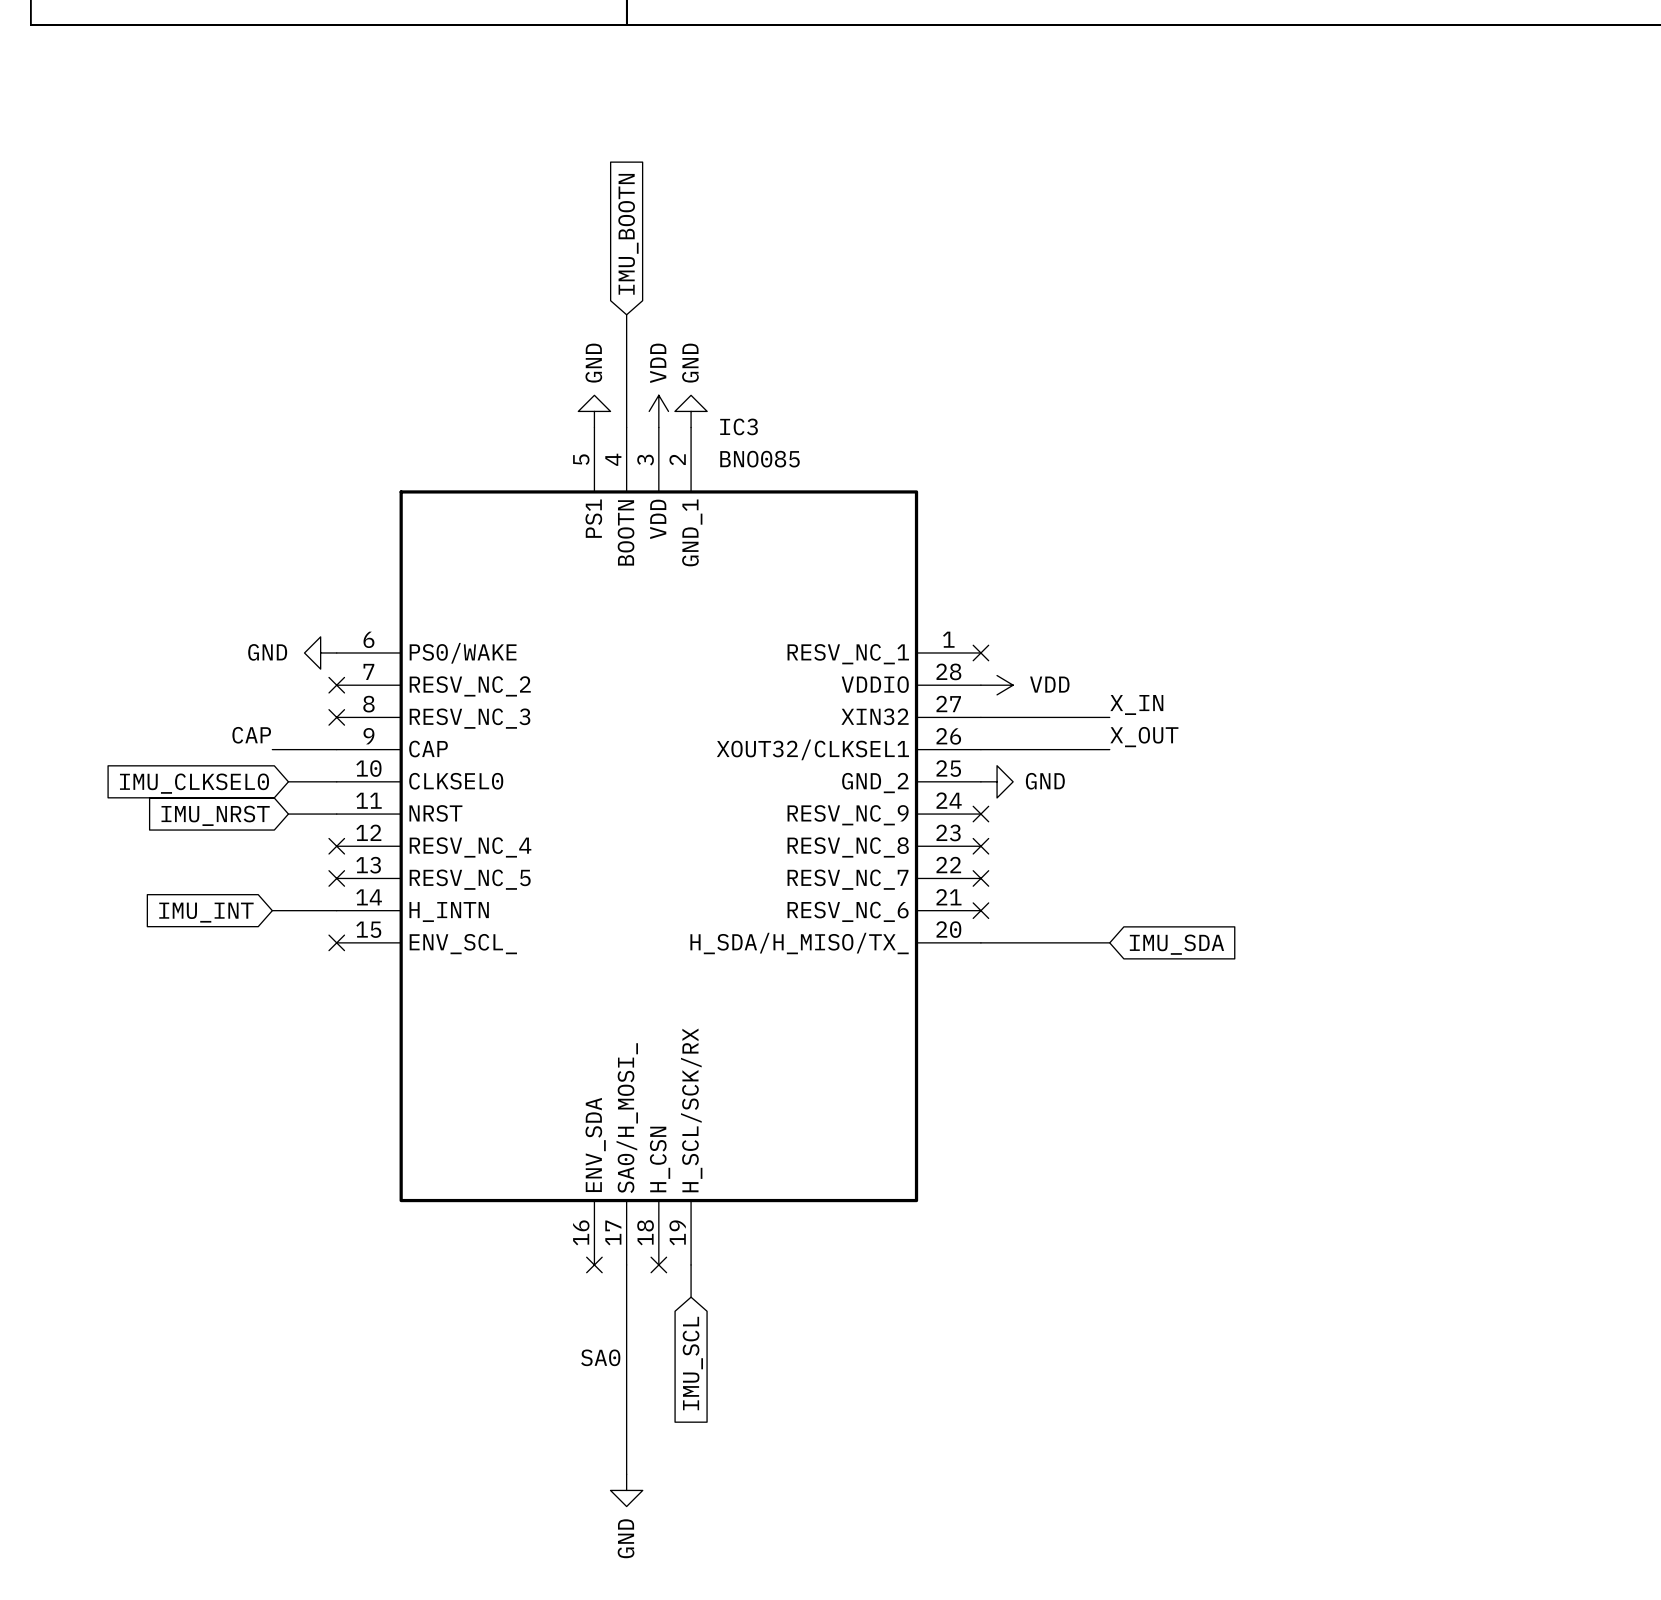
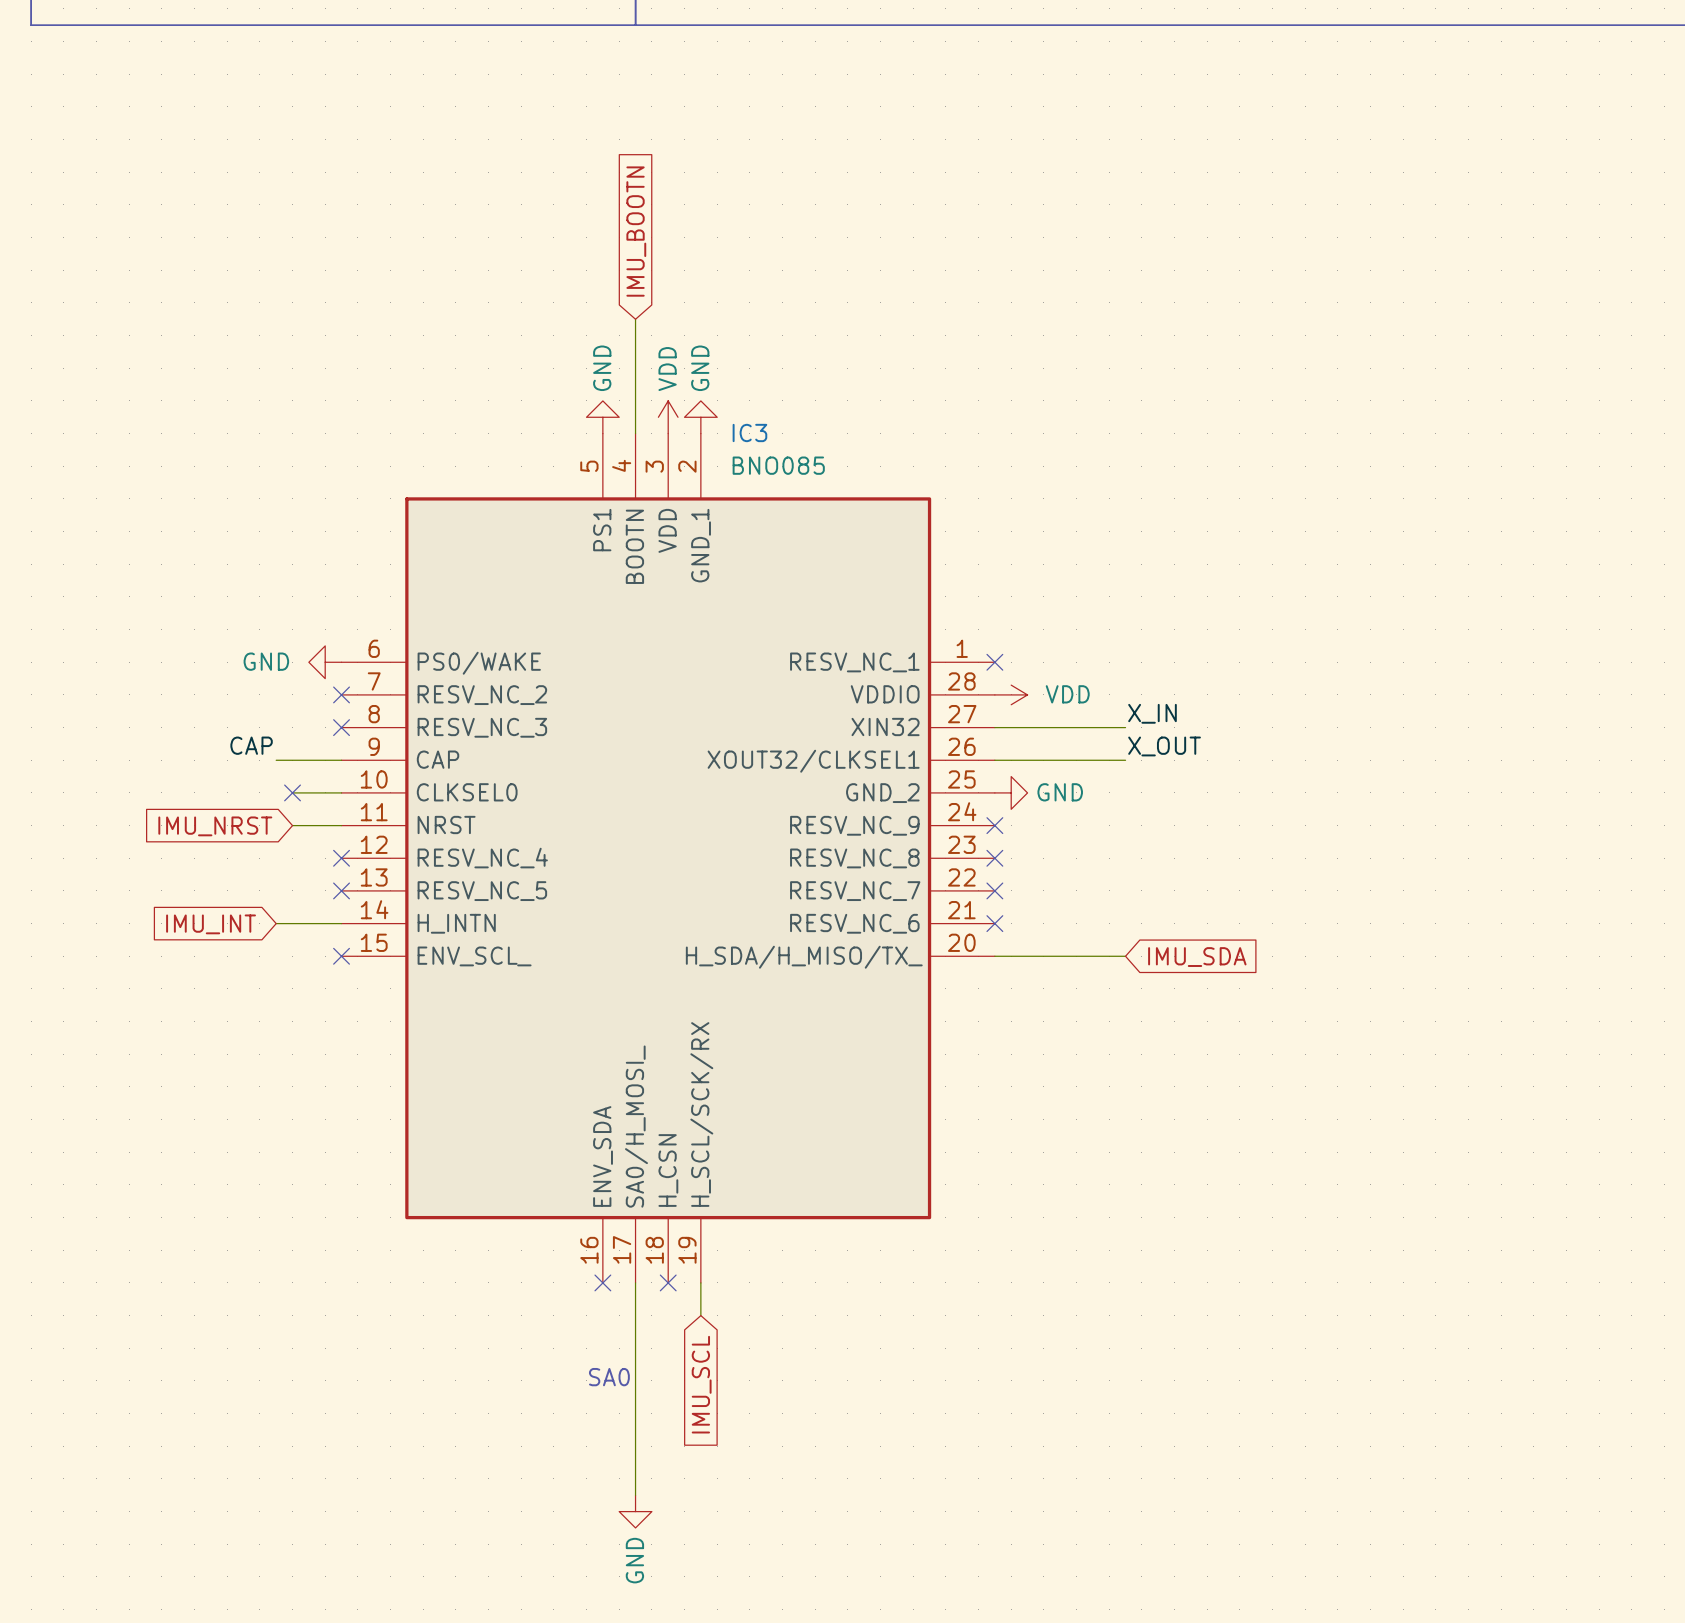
no-connect mark: none -> (292, 792)
global label: IMU_CLKSEL0 (194, 783) -> none

